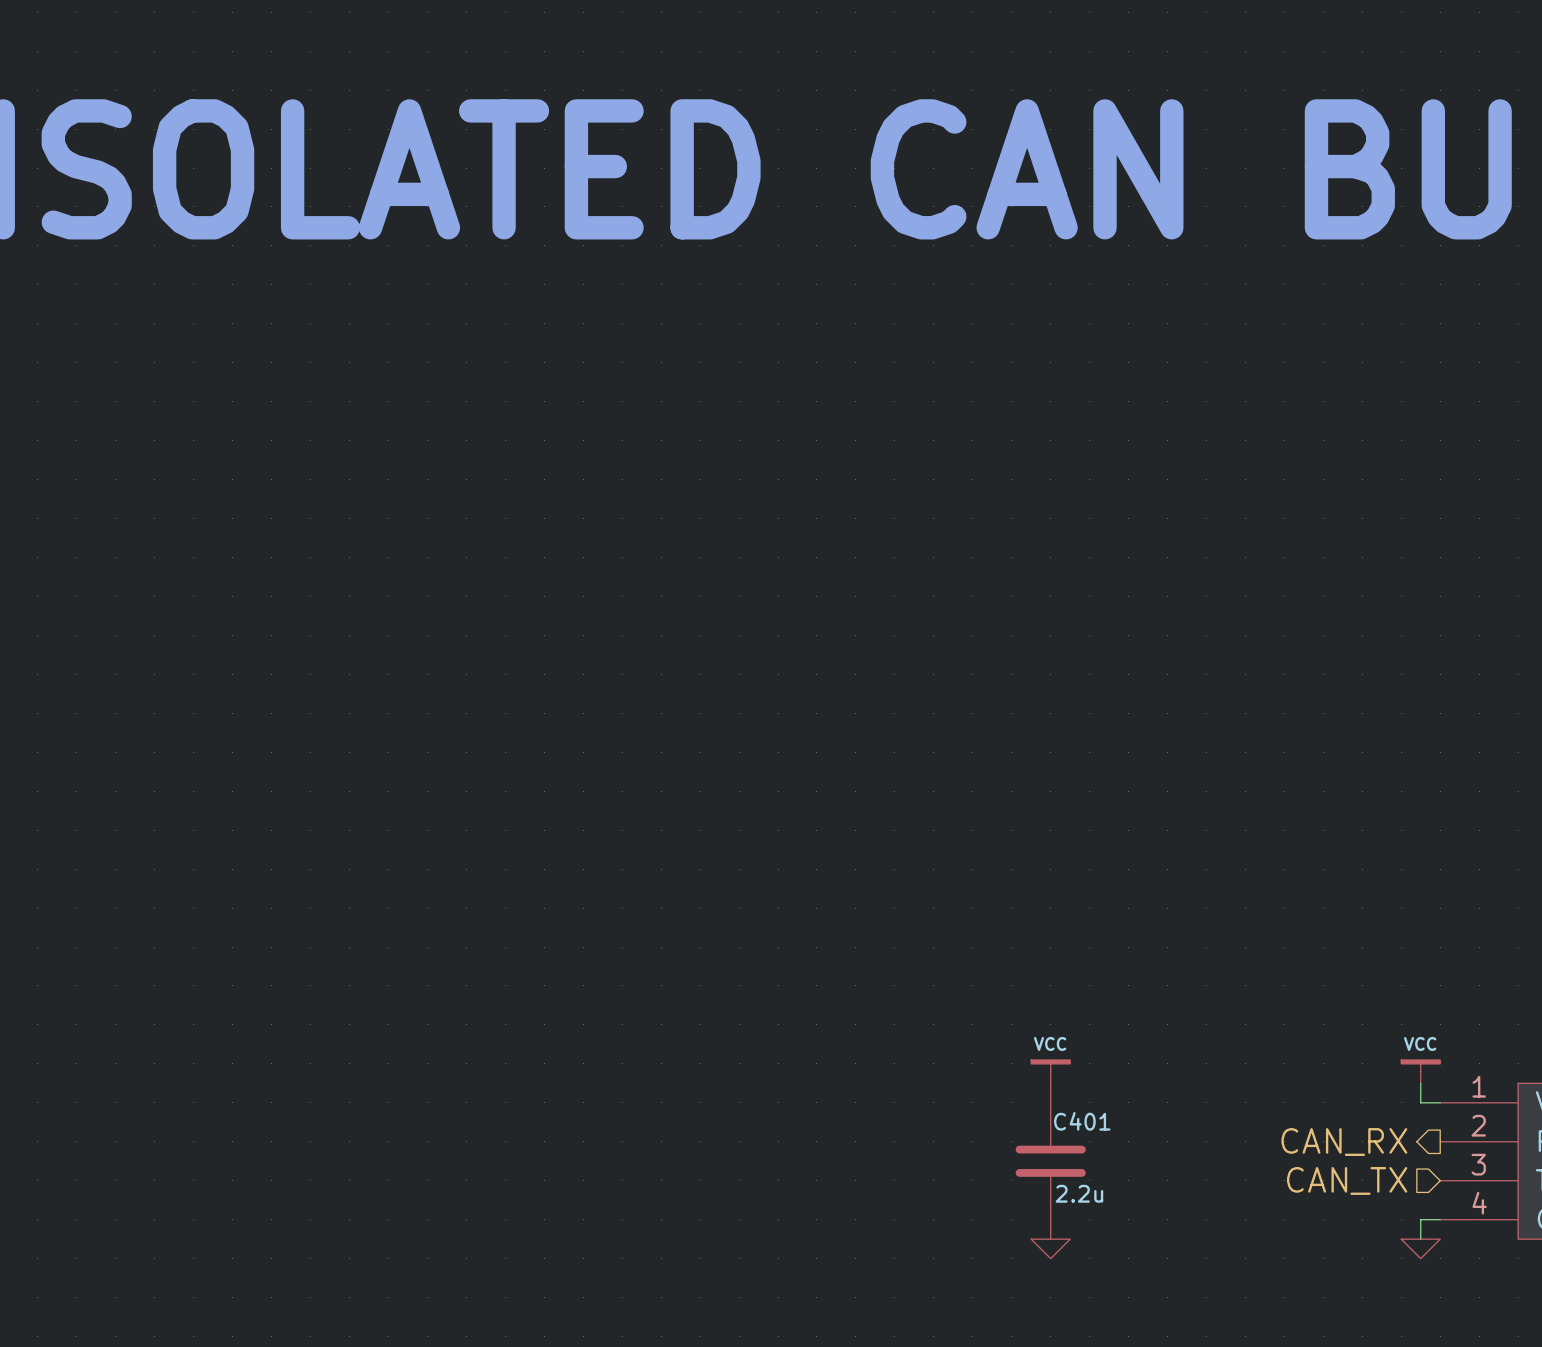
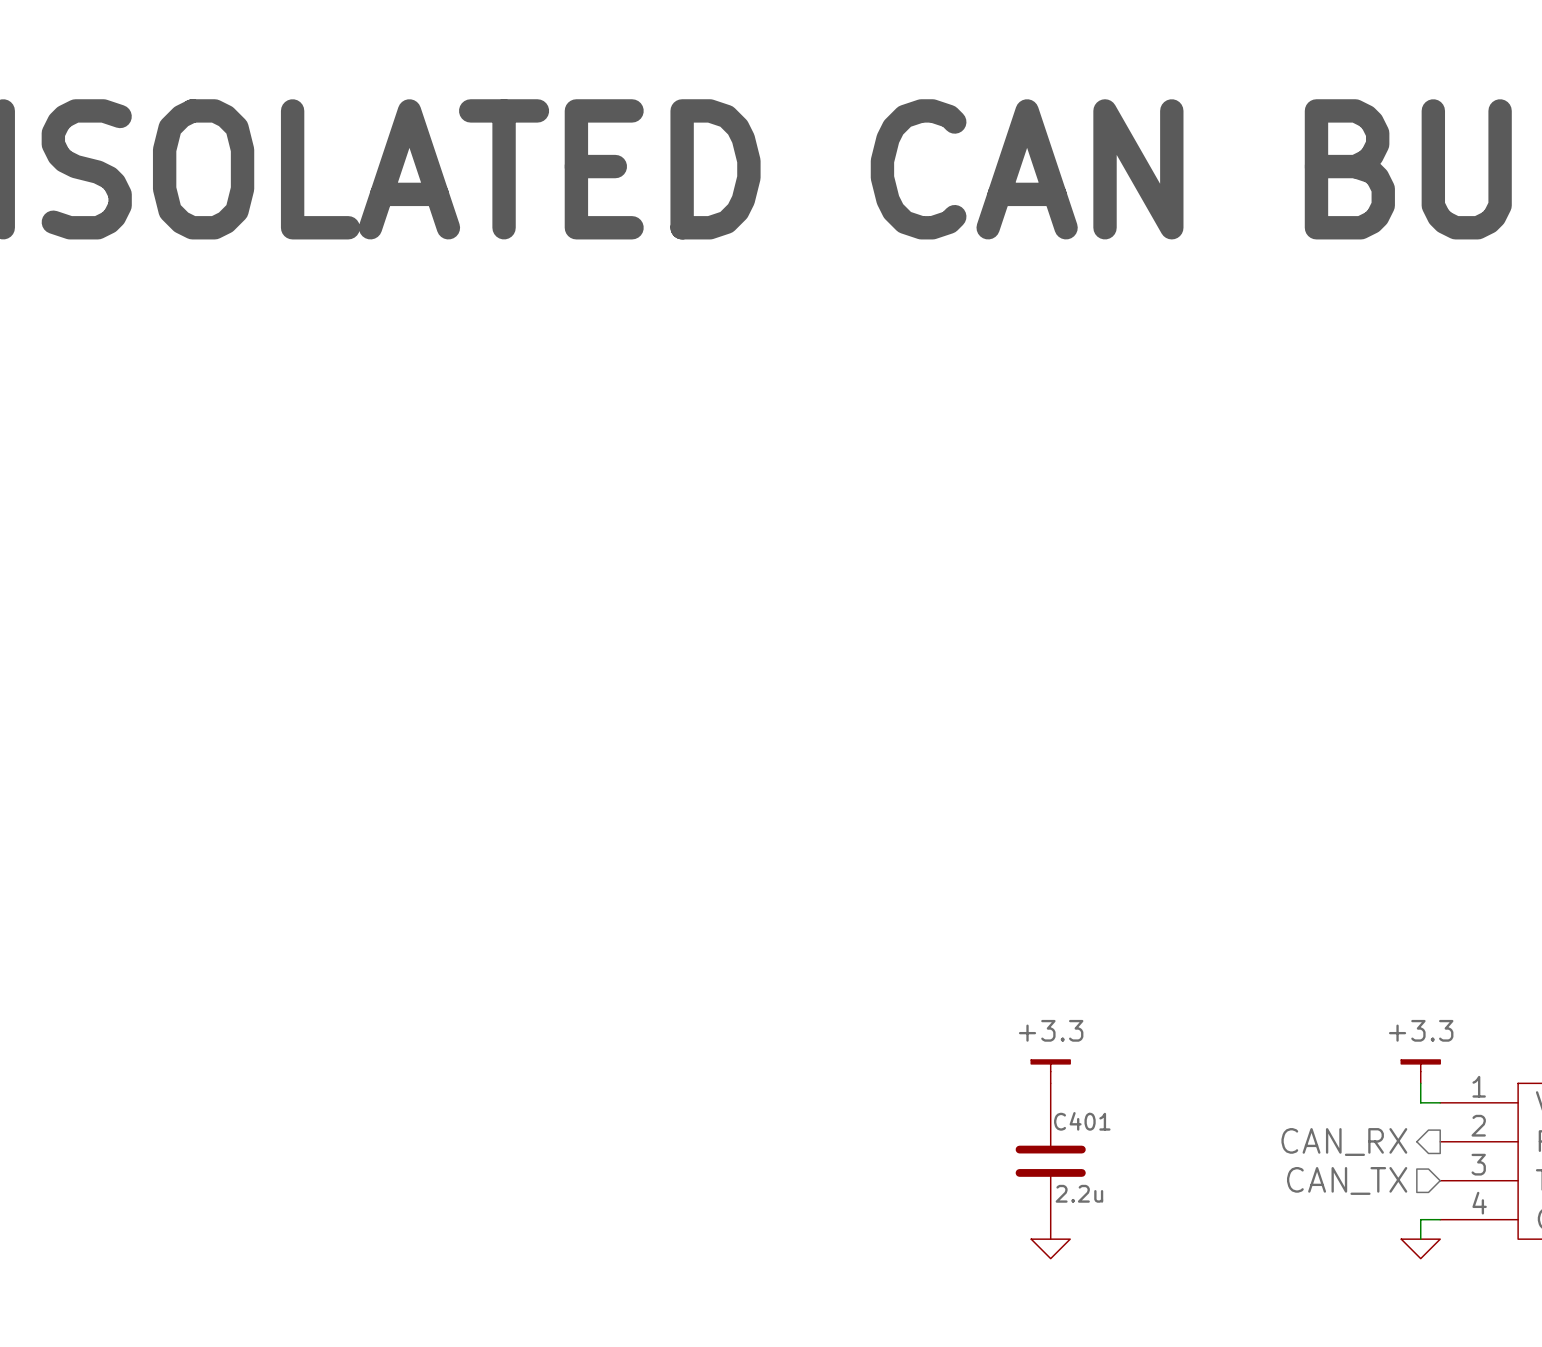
power symbol: VCC (1050, 1071) -> +3.3 (1050, 1071)
power symbol: VCC (1420, 1071) -> +3.3 (1420, 1071)

